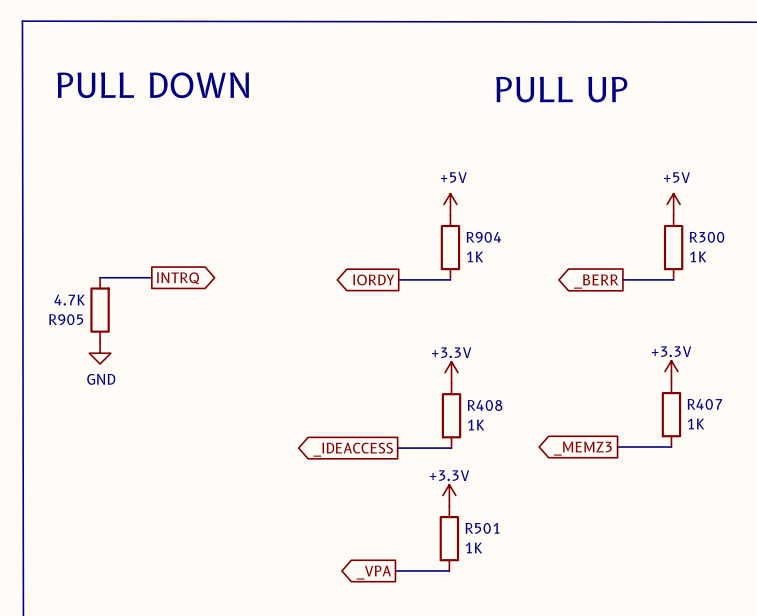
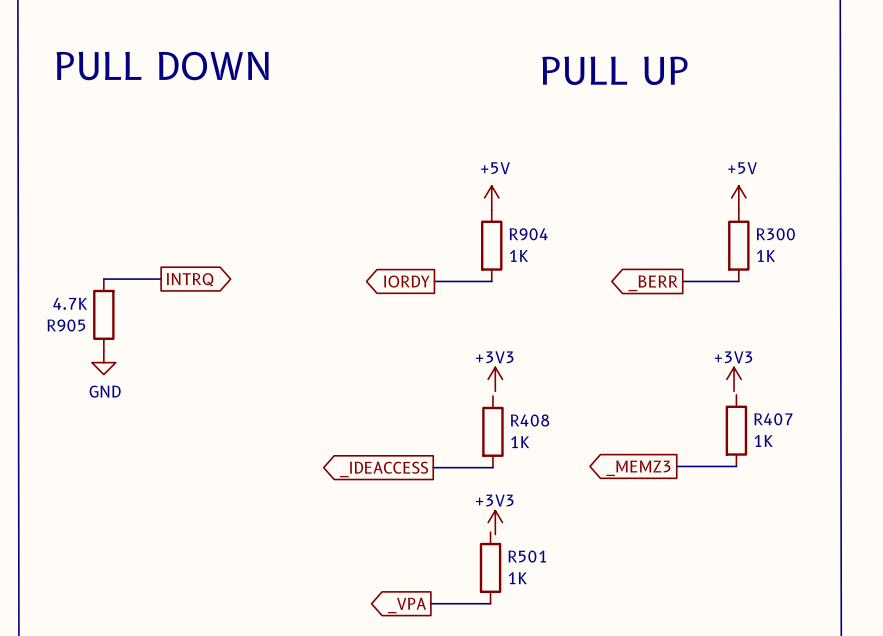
power symbol: +3.3V (671, 371) -> +3V3 (734, 379)
power symbol: +3.3V (451, 372) -> +3V3 (495, 379)
power symbol: +3.3V (449, 495) -> +3V3 (495, 522)

